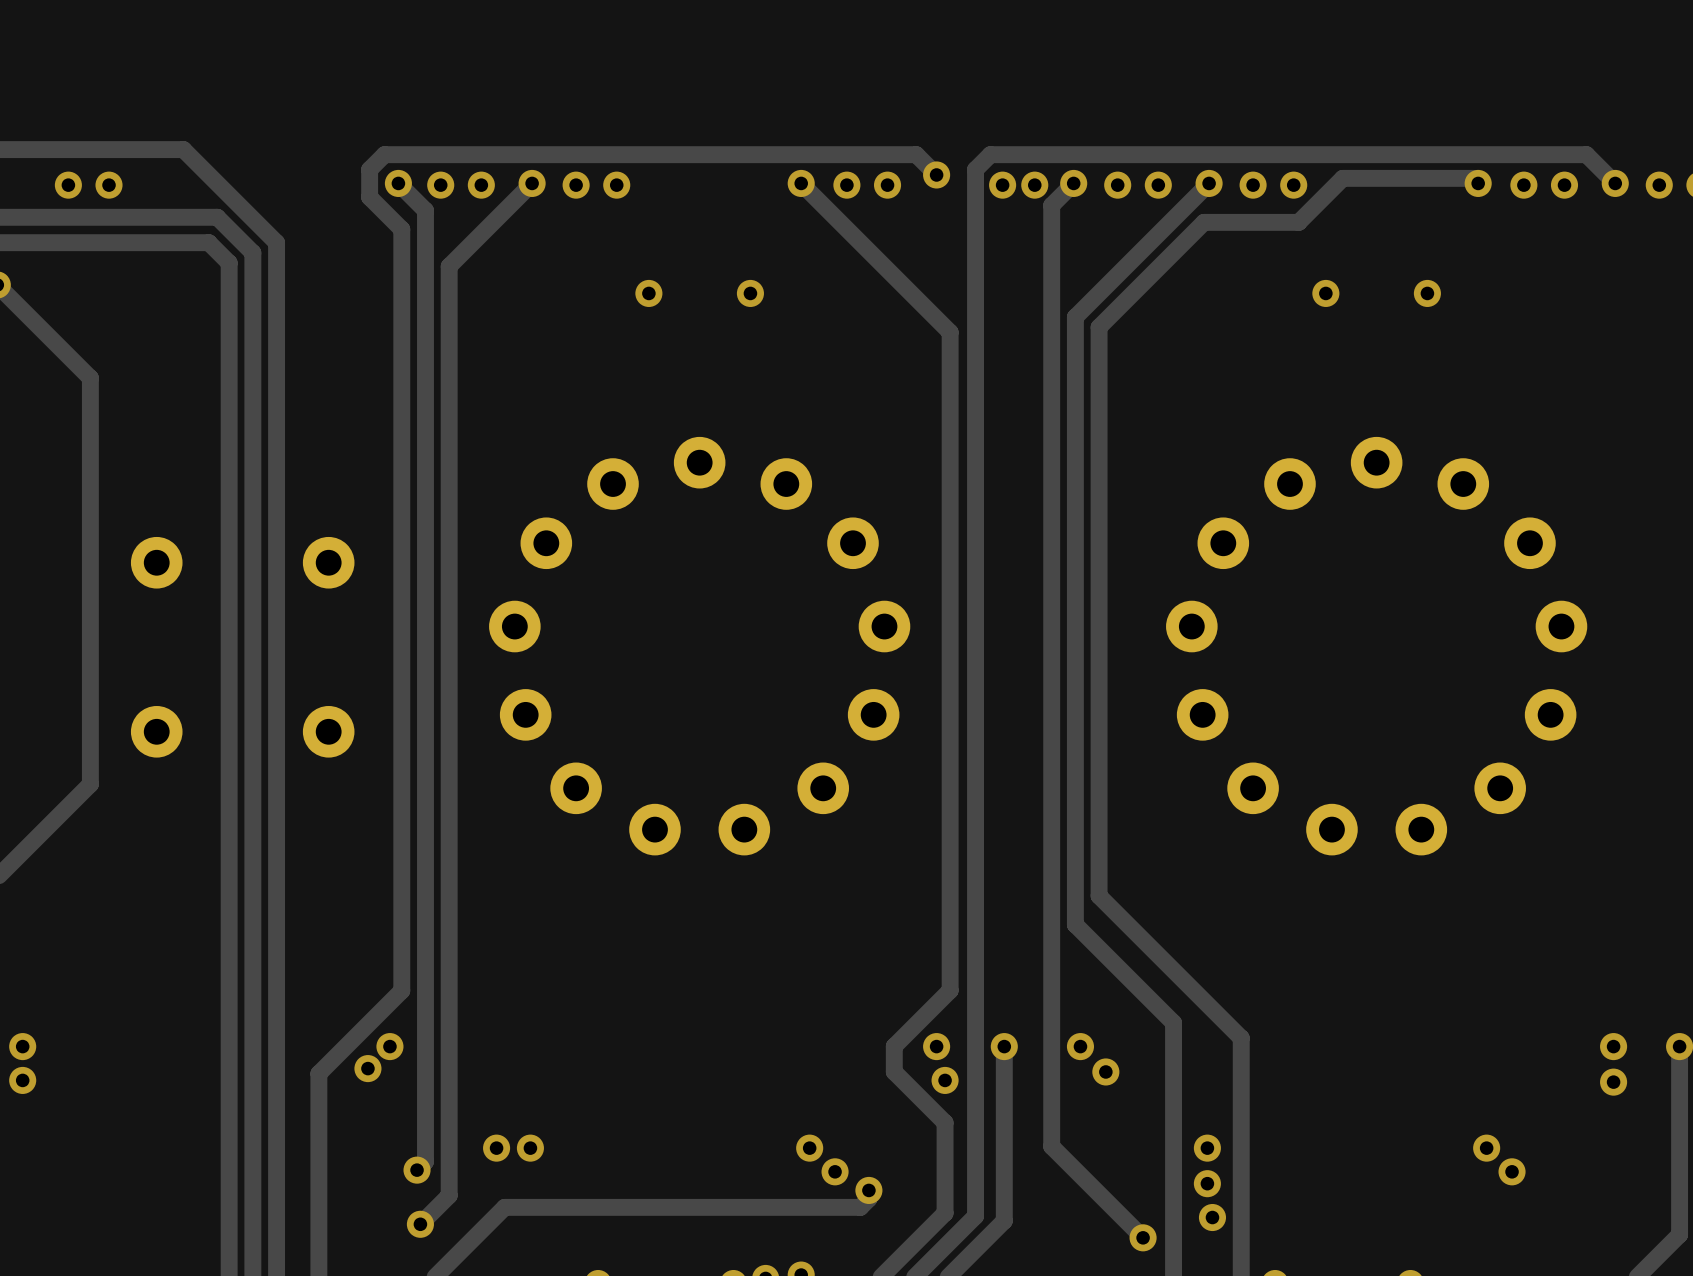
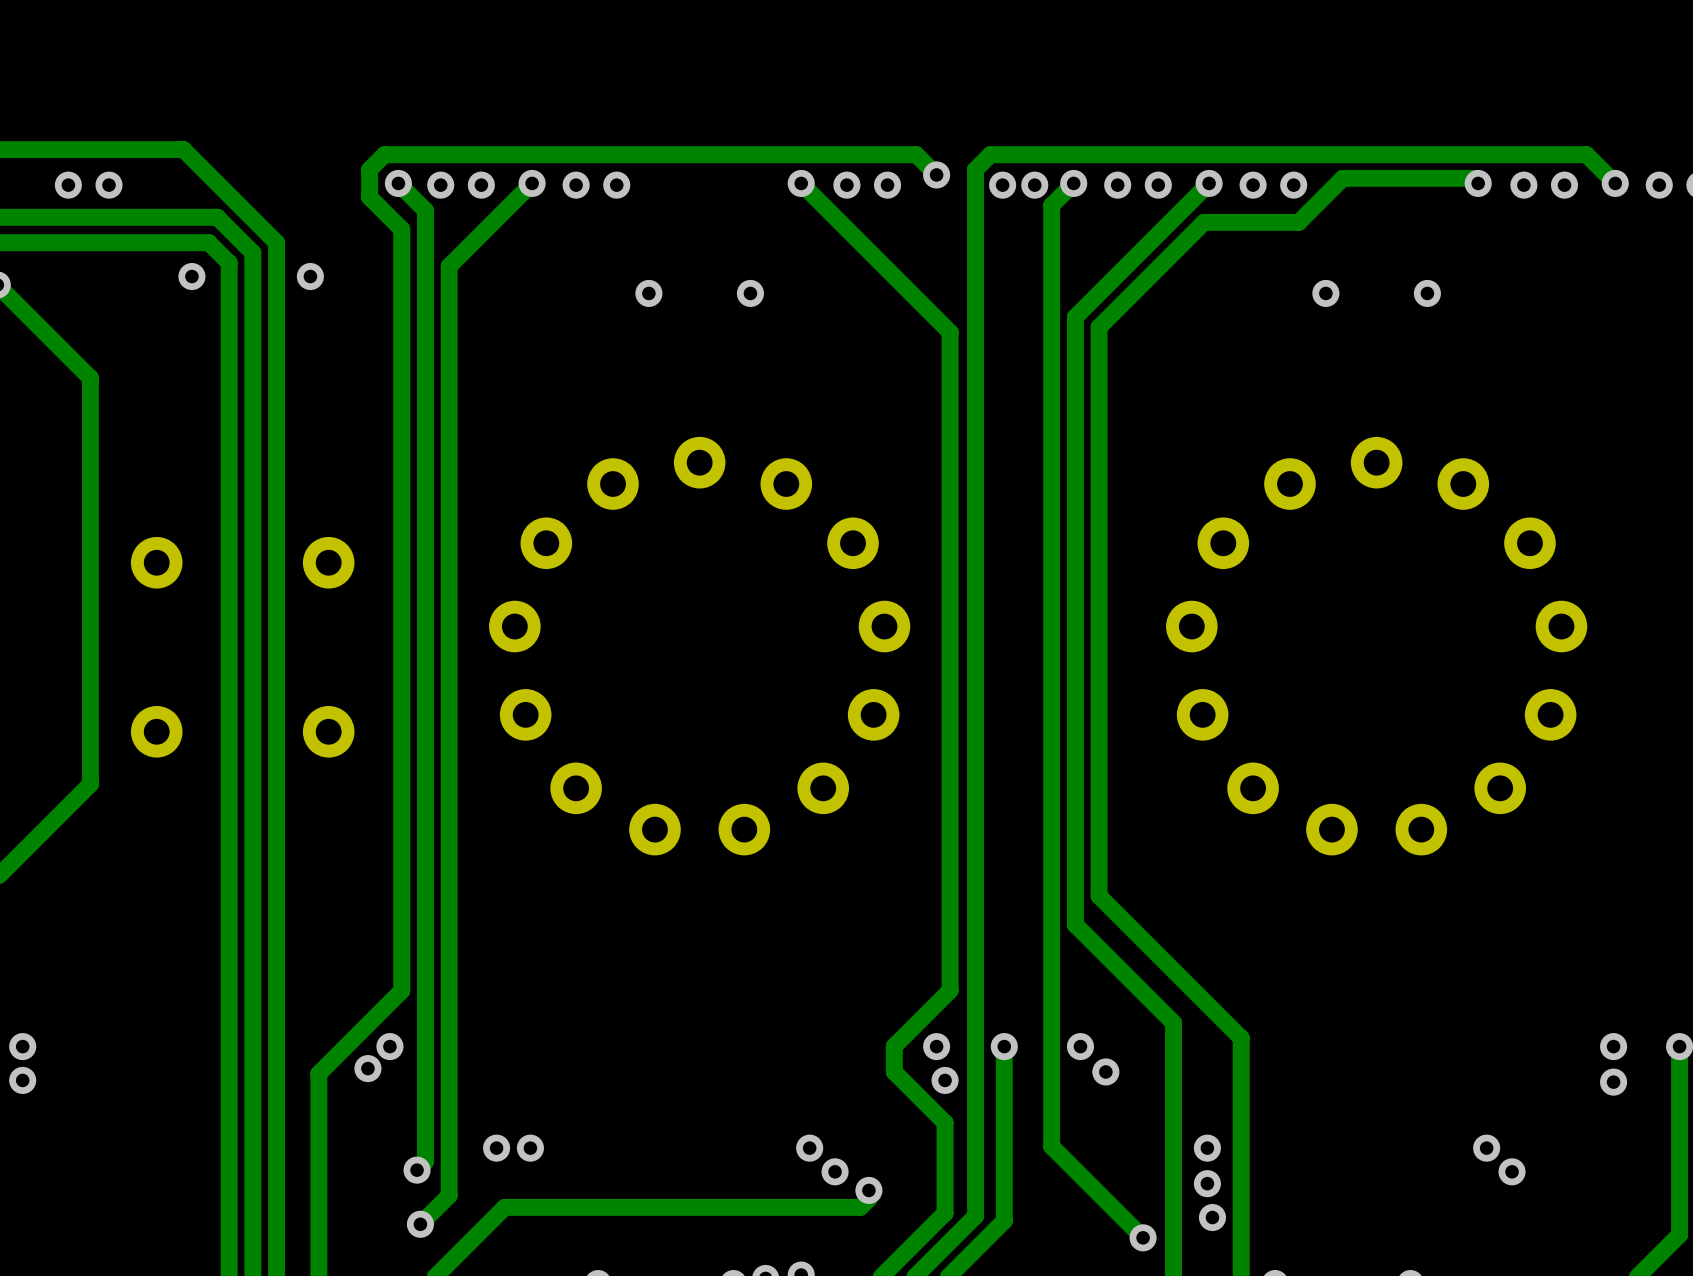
via: none -> (191, 276)
via: none -> (310, 276)

